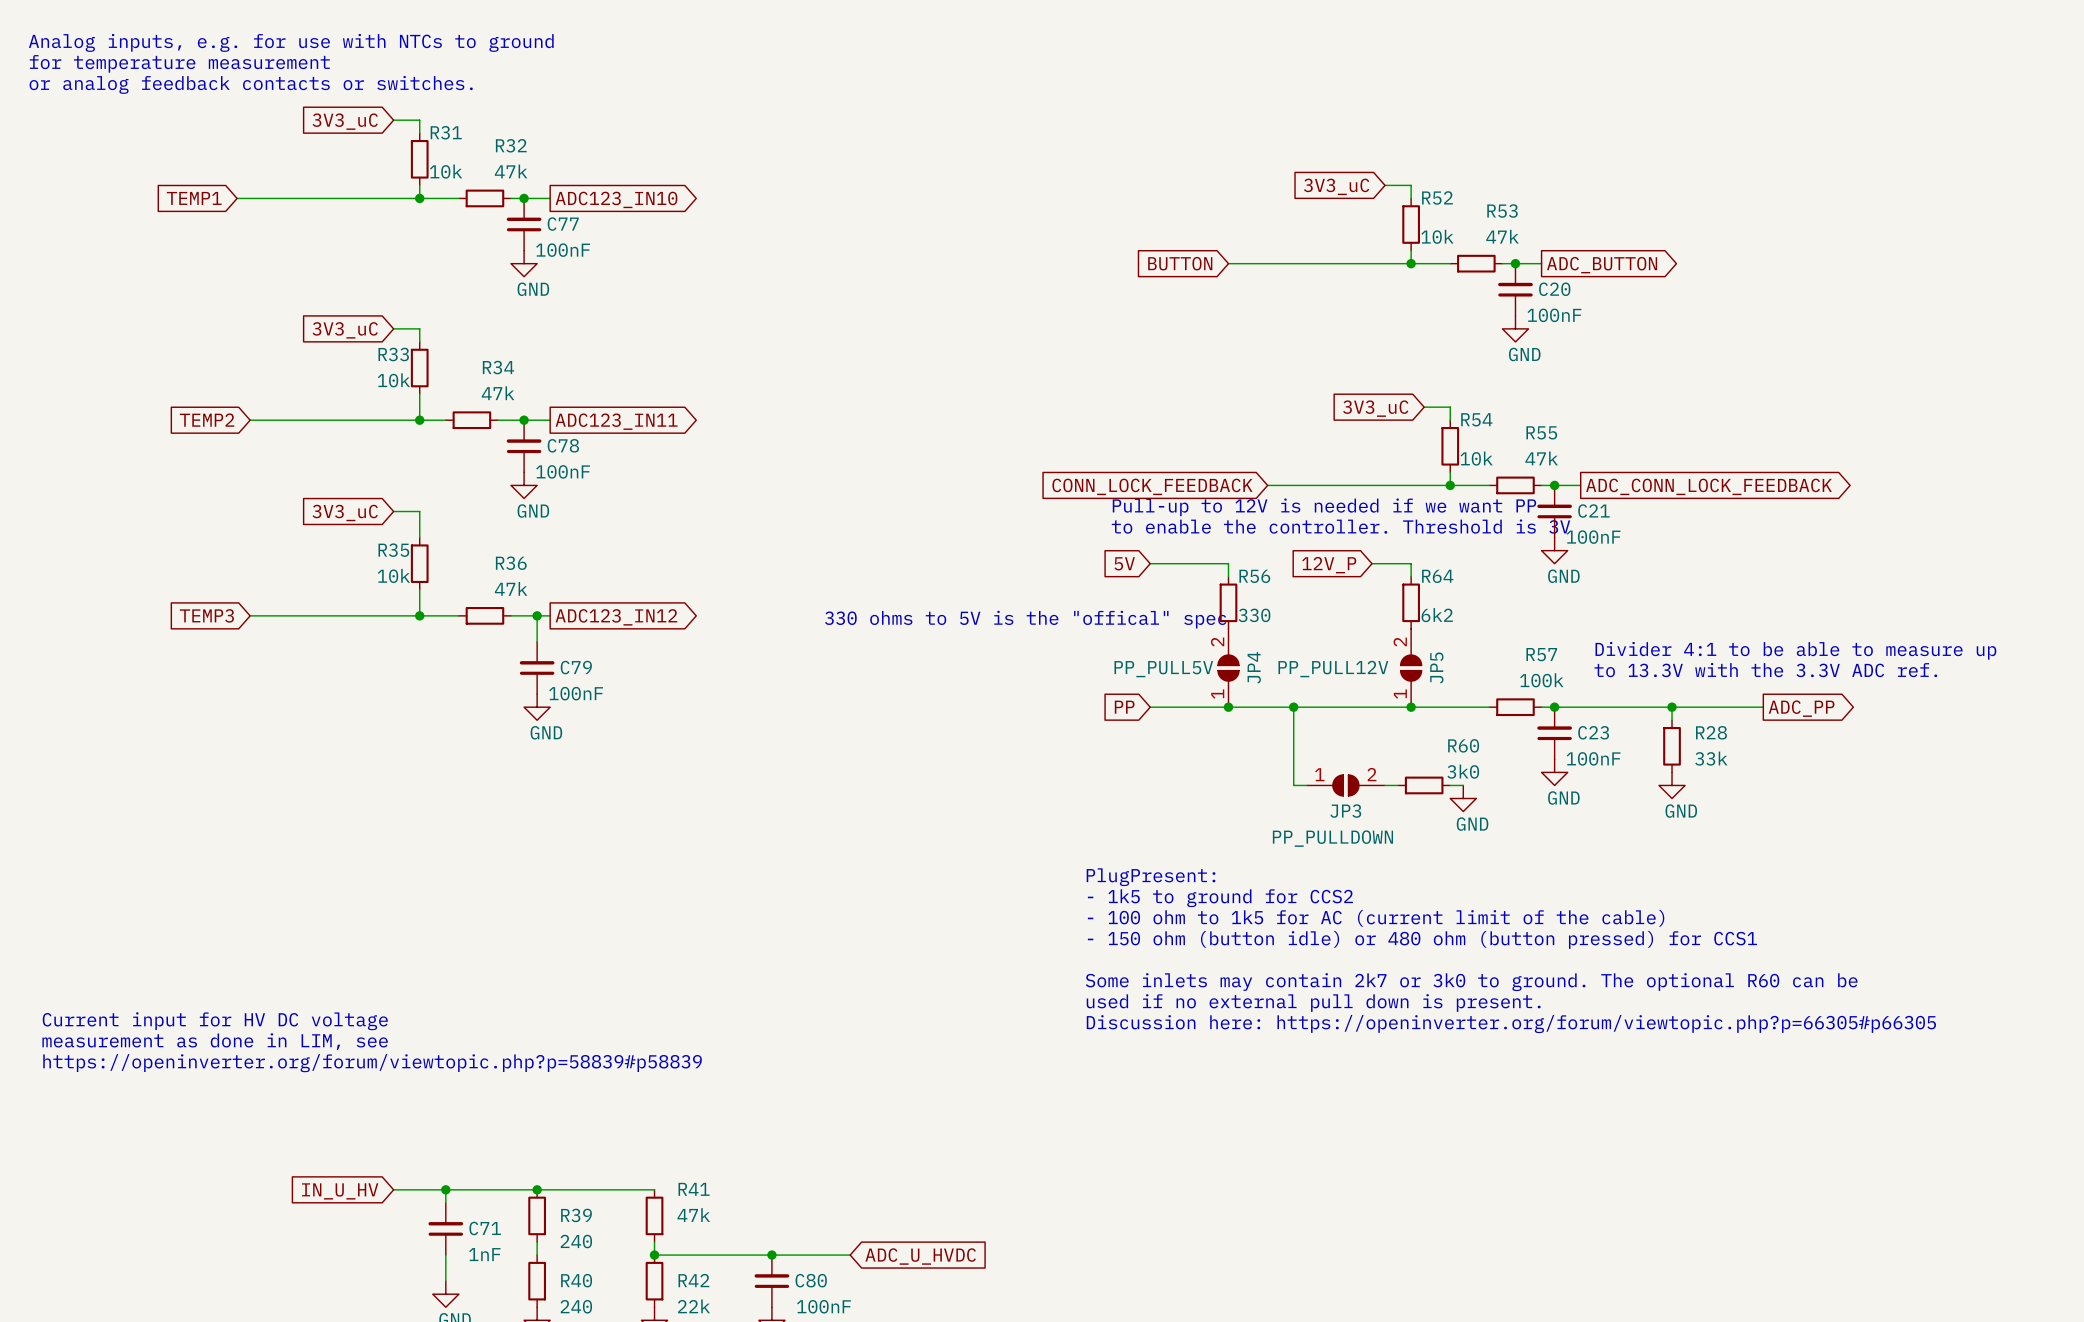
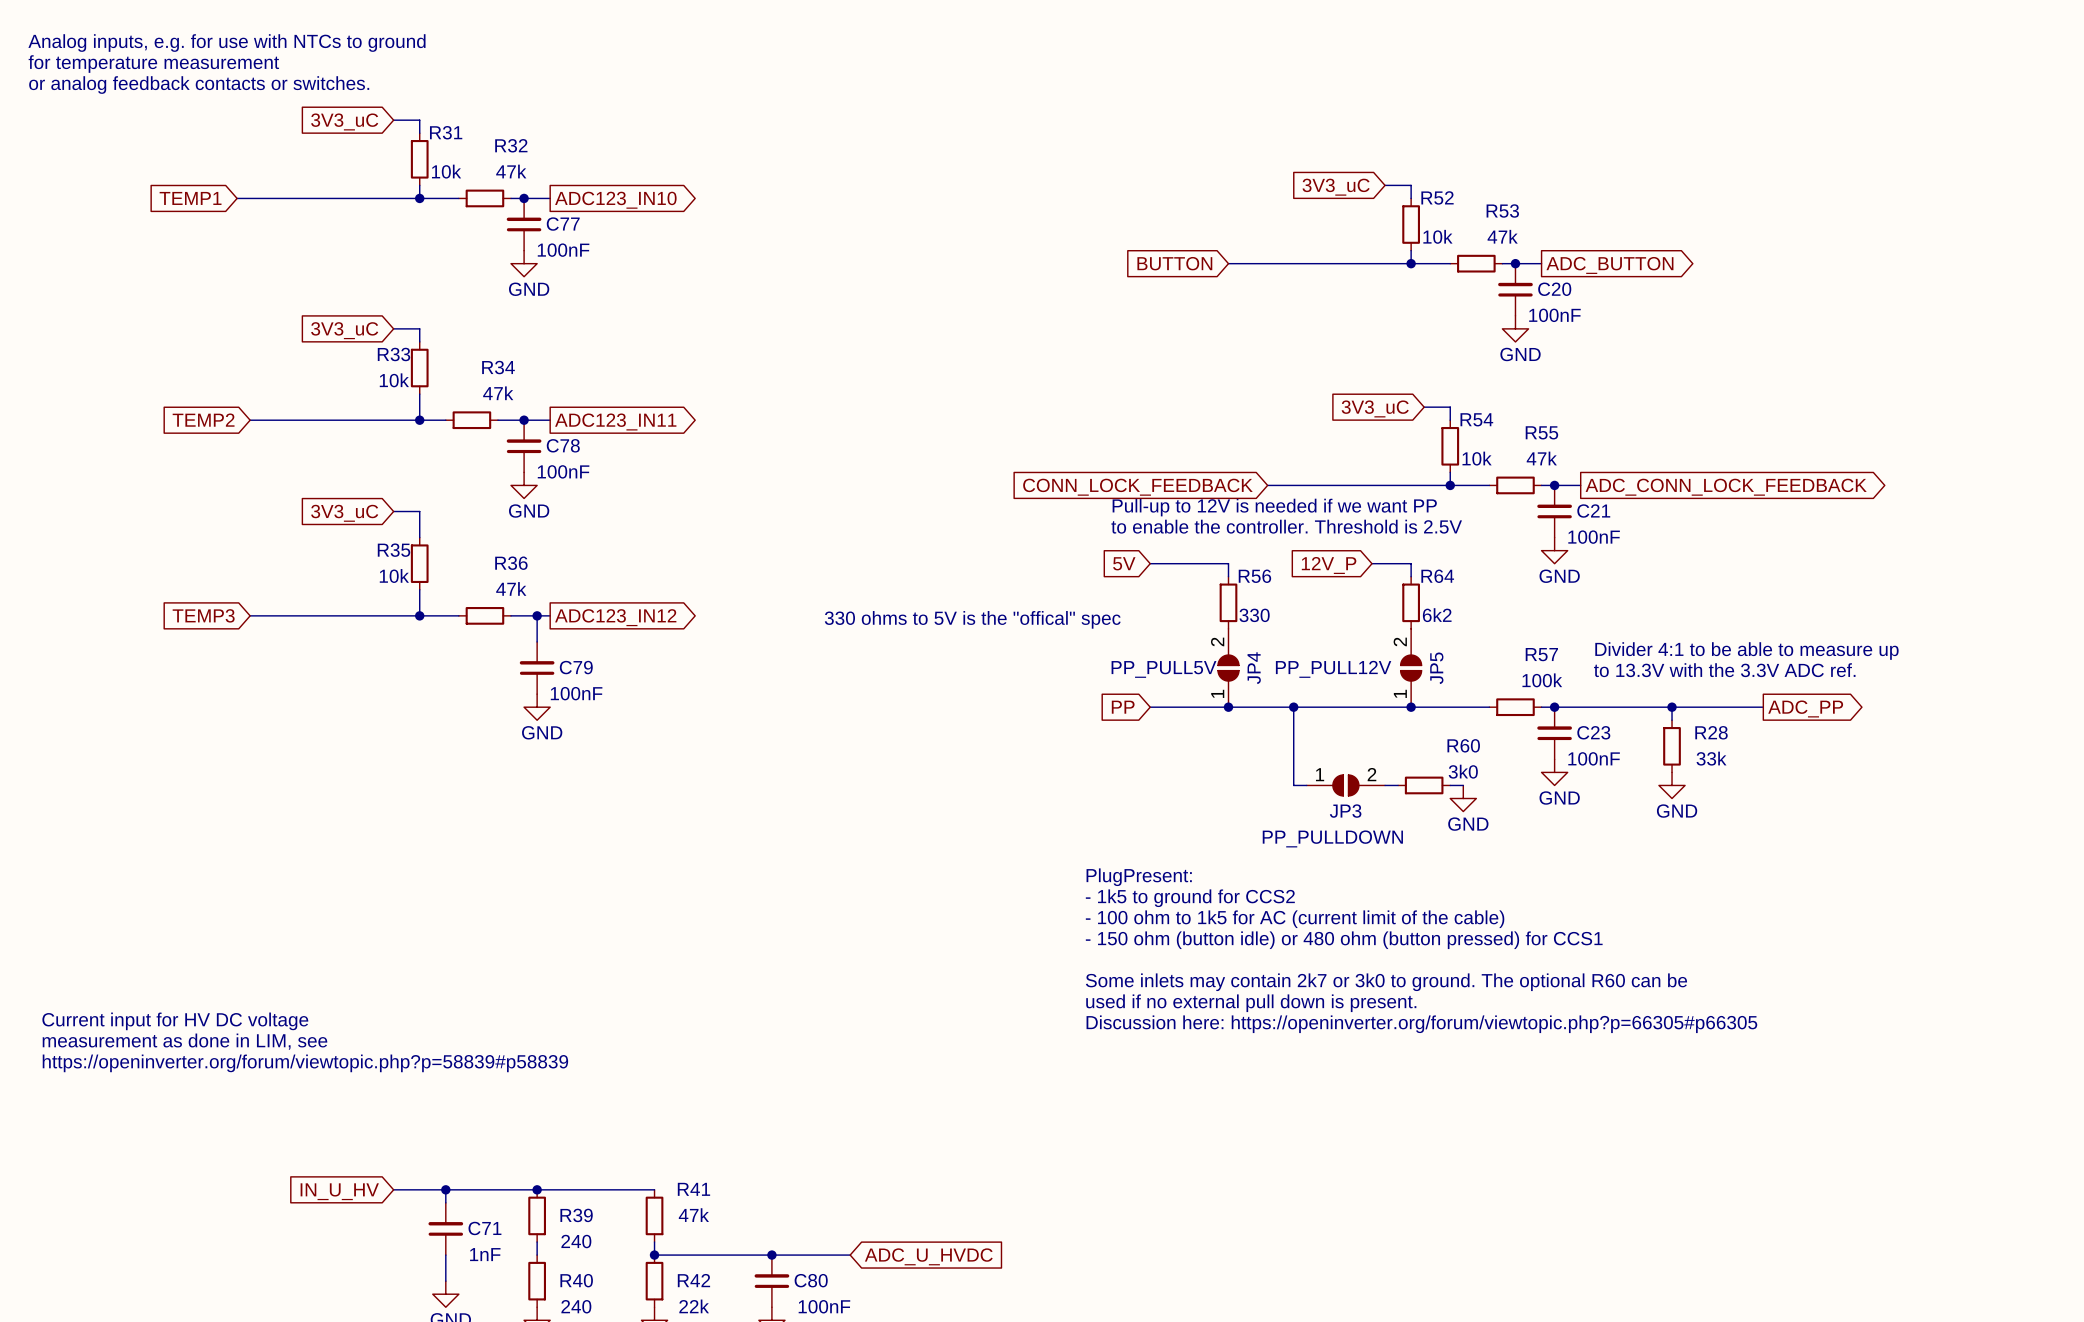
text: to enable the controller. Threshold is 3V (1341, 526) -> to enable the controller. Threshold is 2.5V (1286, 526)

